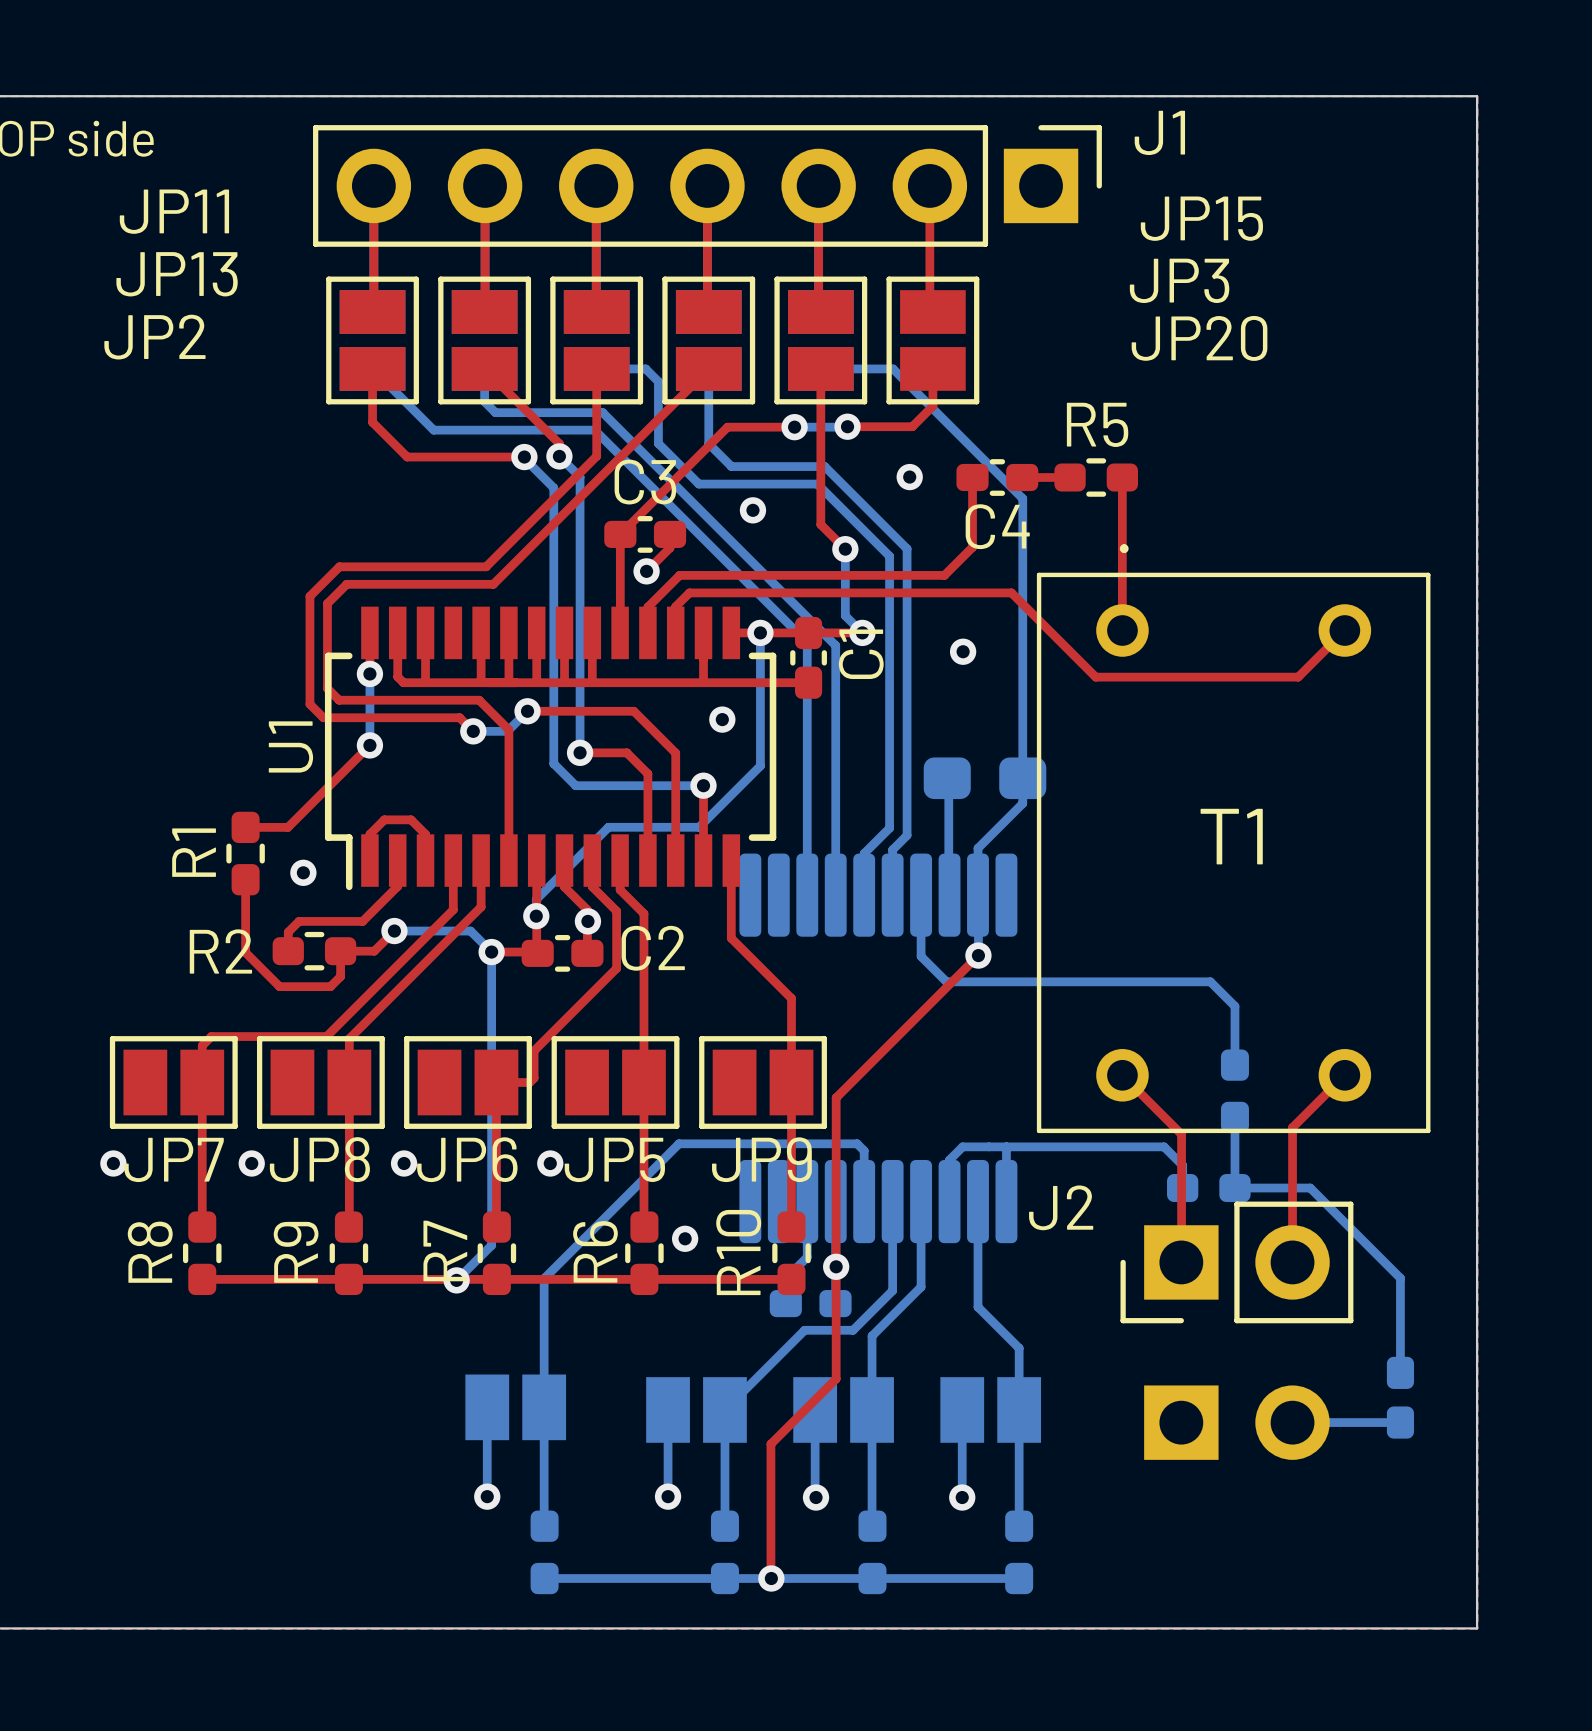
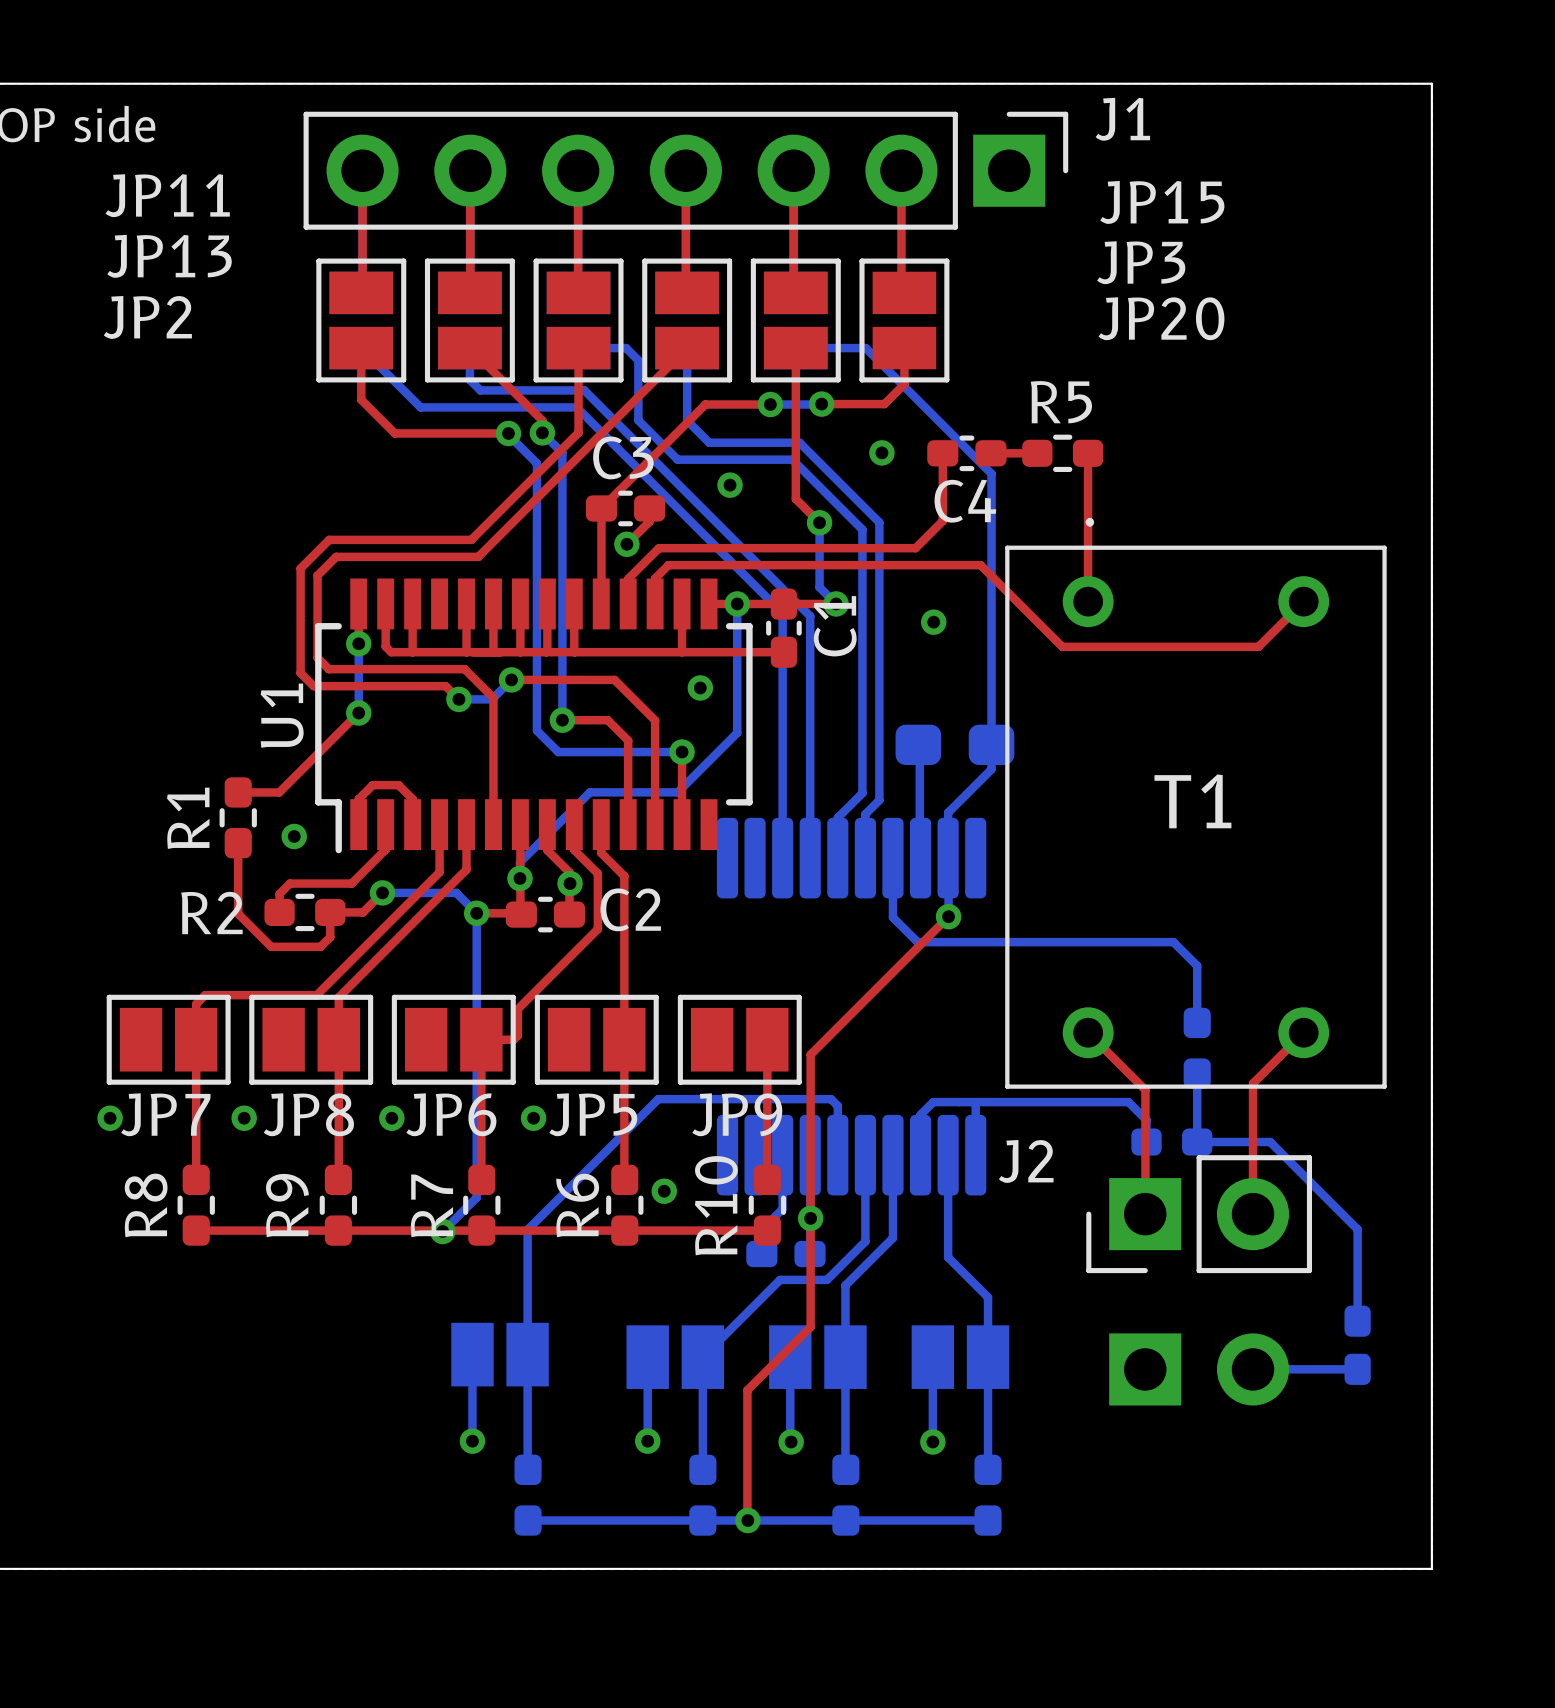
top track: (731, 860) (731, 938) (791, 998) (791, 1082) -> none

